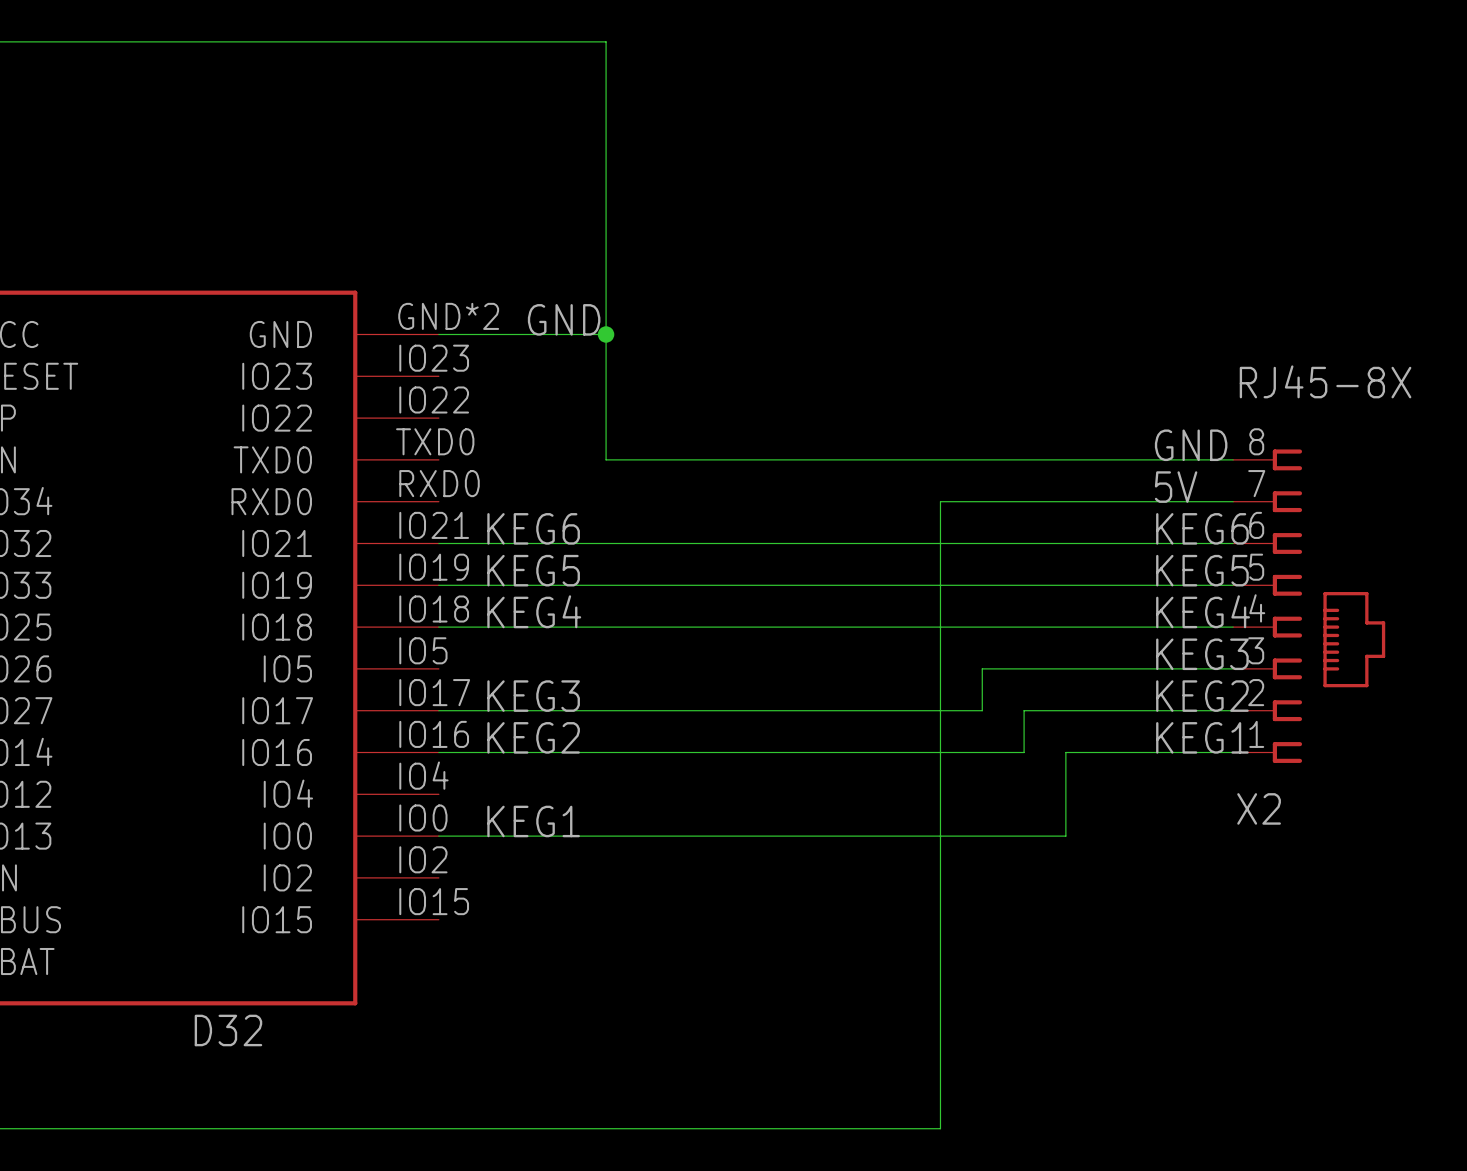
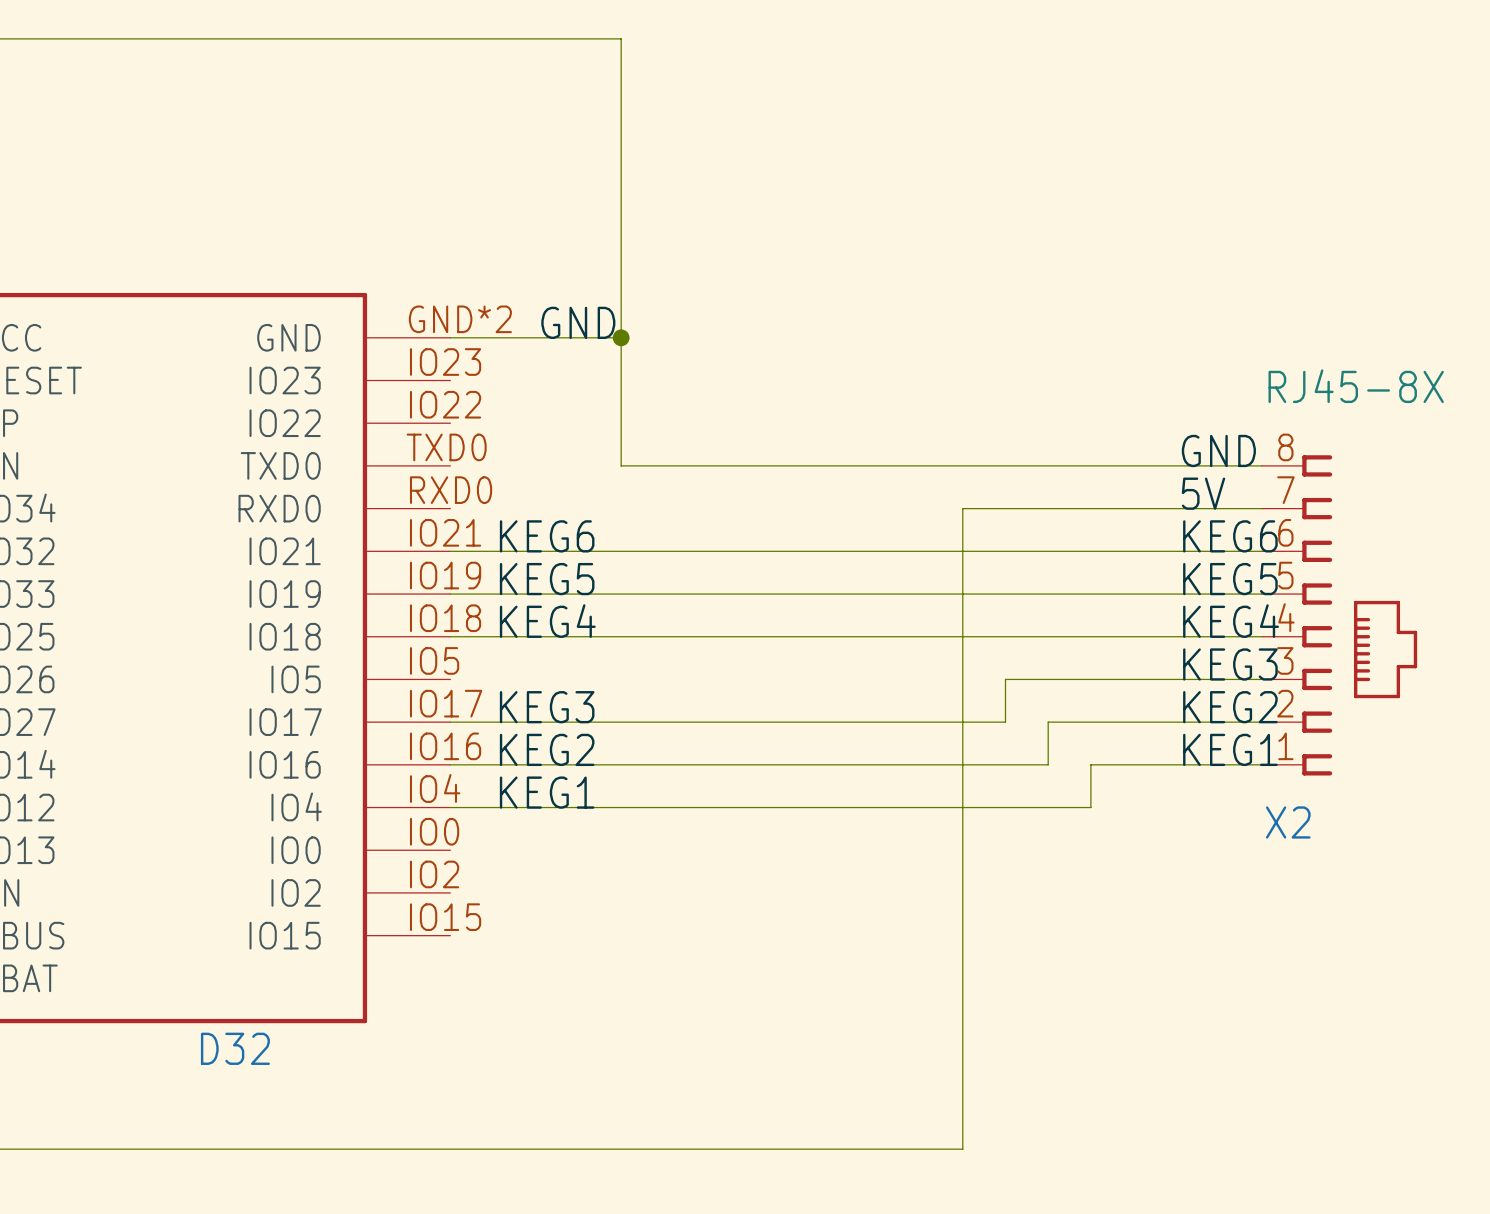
wire: (1065, 794) (1065, 836) (438, 836) -> (1090, 807) (450, 807)
label position: KEG1 (533, 821) -> KEG1 (547, 792)

